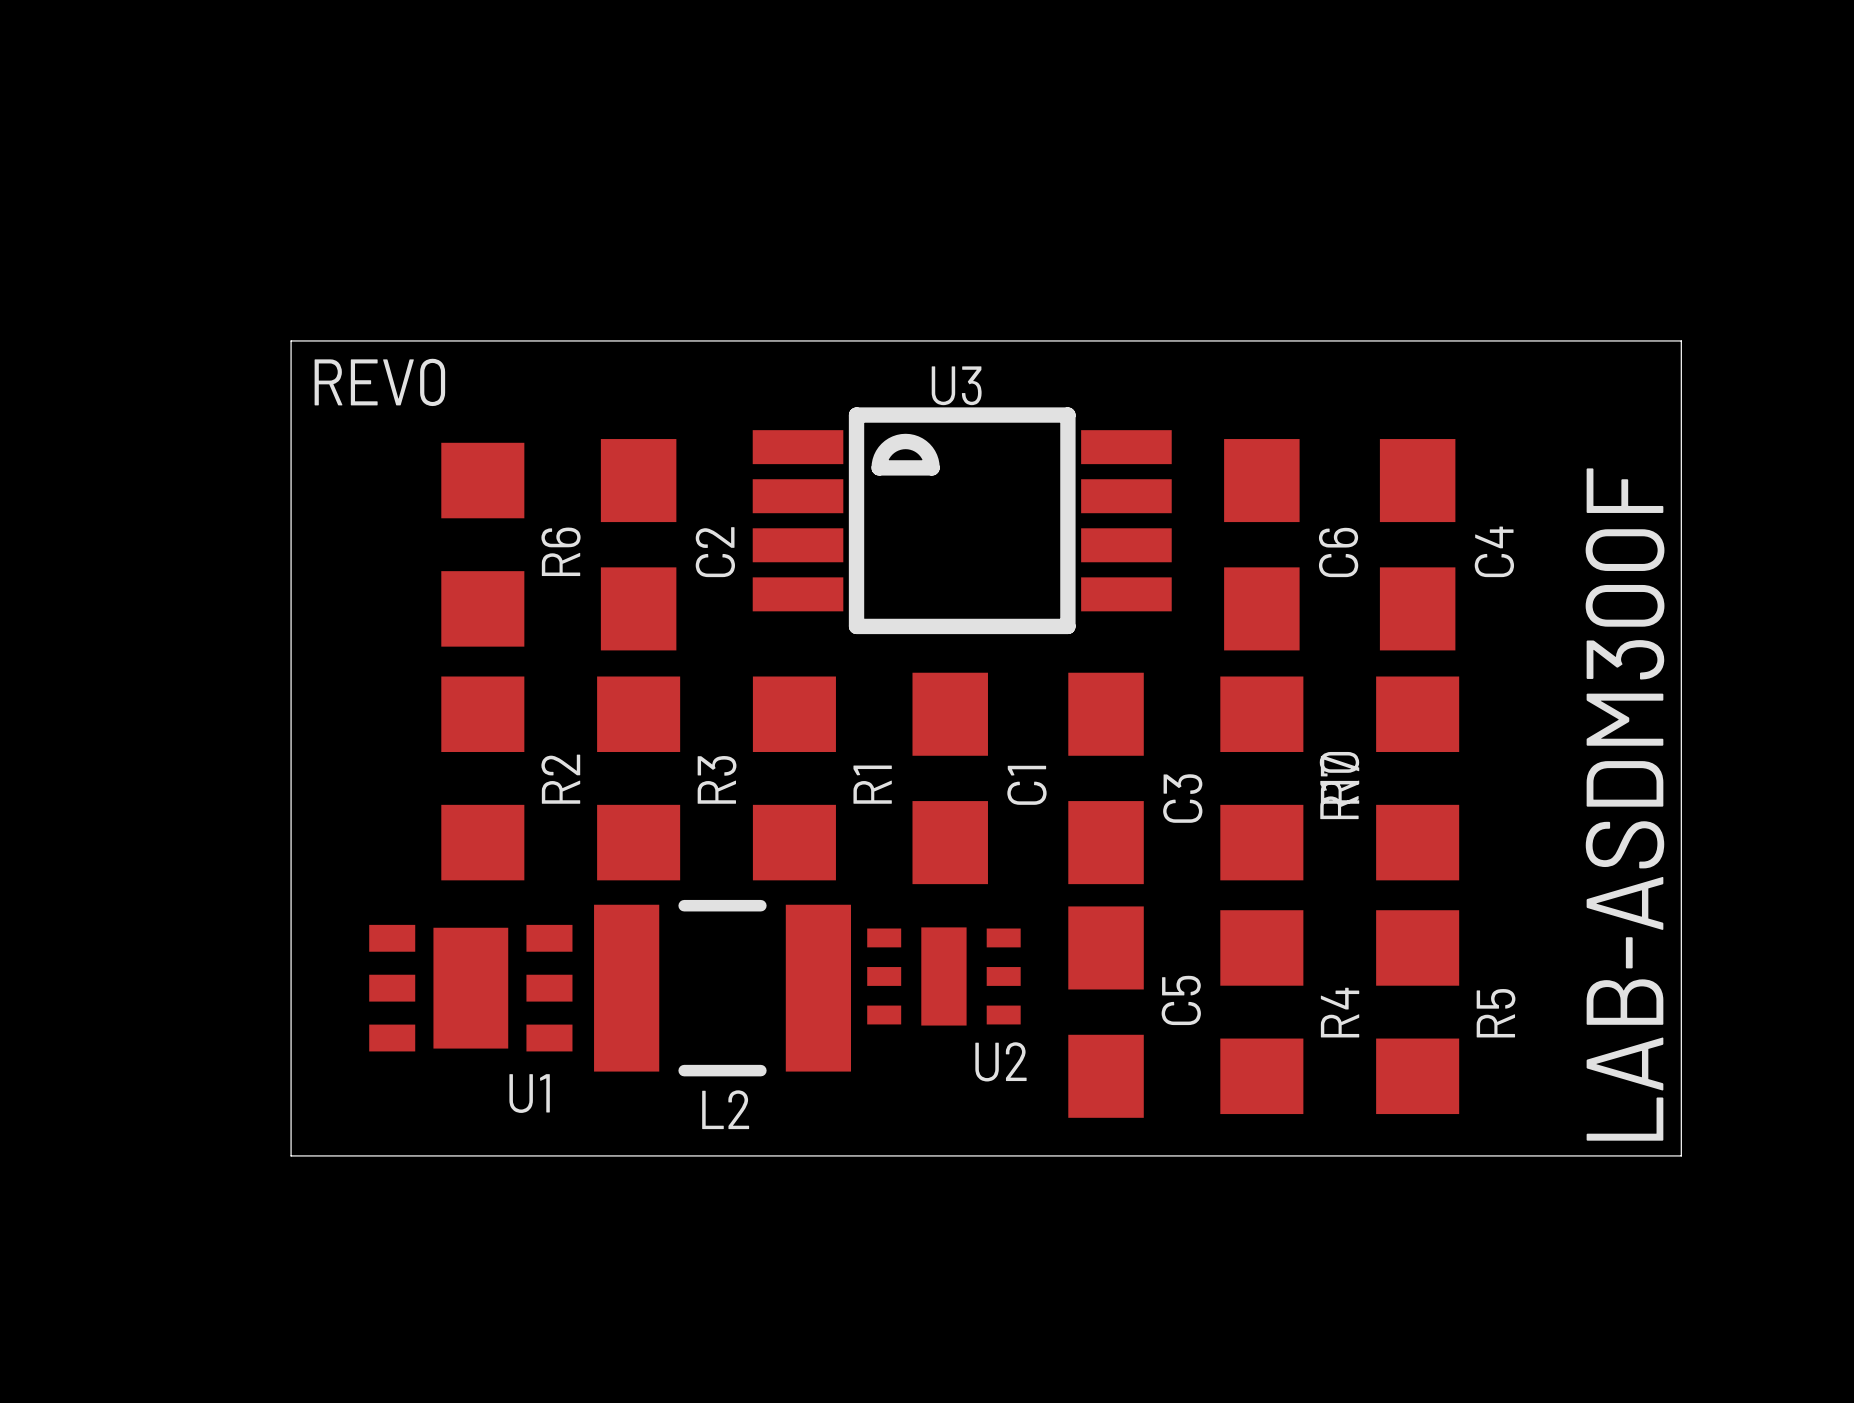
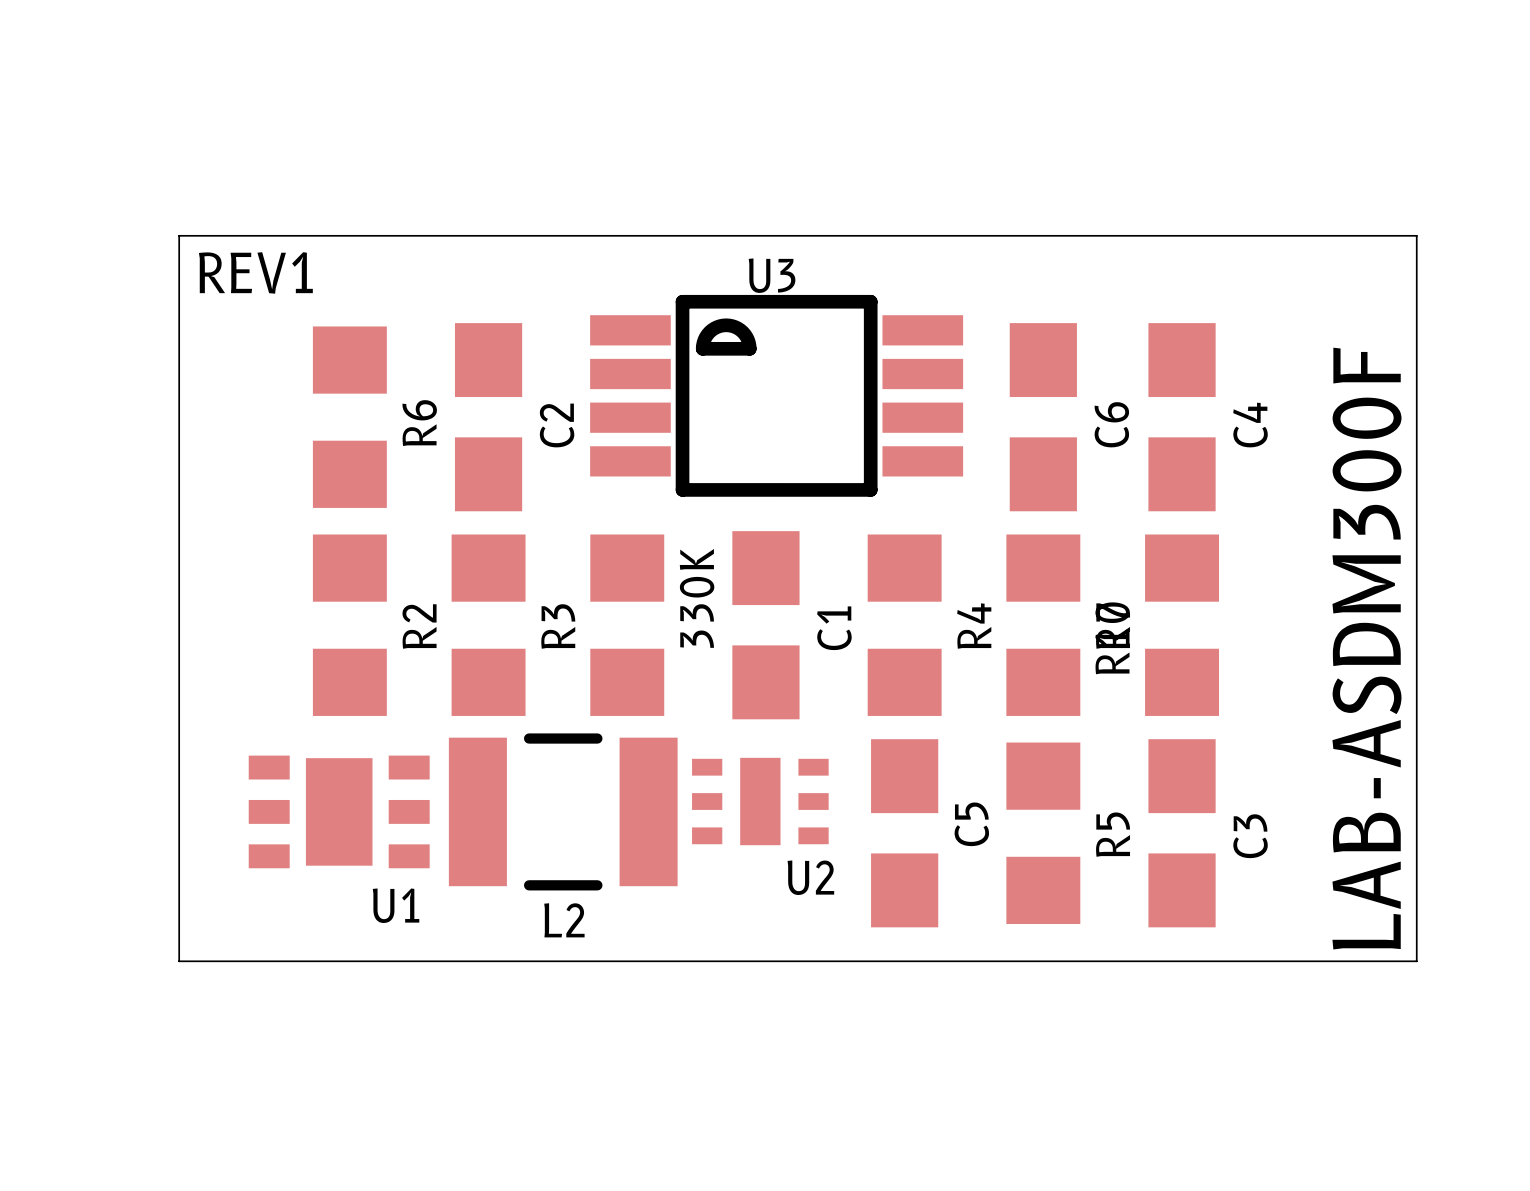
text: REV0 (379, 382) -> REV1 (255, 272)
C3 position: (1106, 778) -> (1182, 833)
R4: none -> (904, 625)
R1 name: R1 (872, 784) -> 330K (697, 598)
C3 name position: C3 (1182, 798) -> C3 (1250, 836)
R4 name: R4 (1340, 1012) -> R5 (1113, 834)
R5: (1417, 1012) -> none

